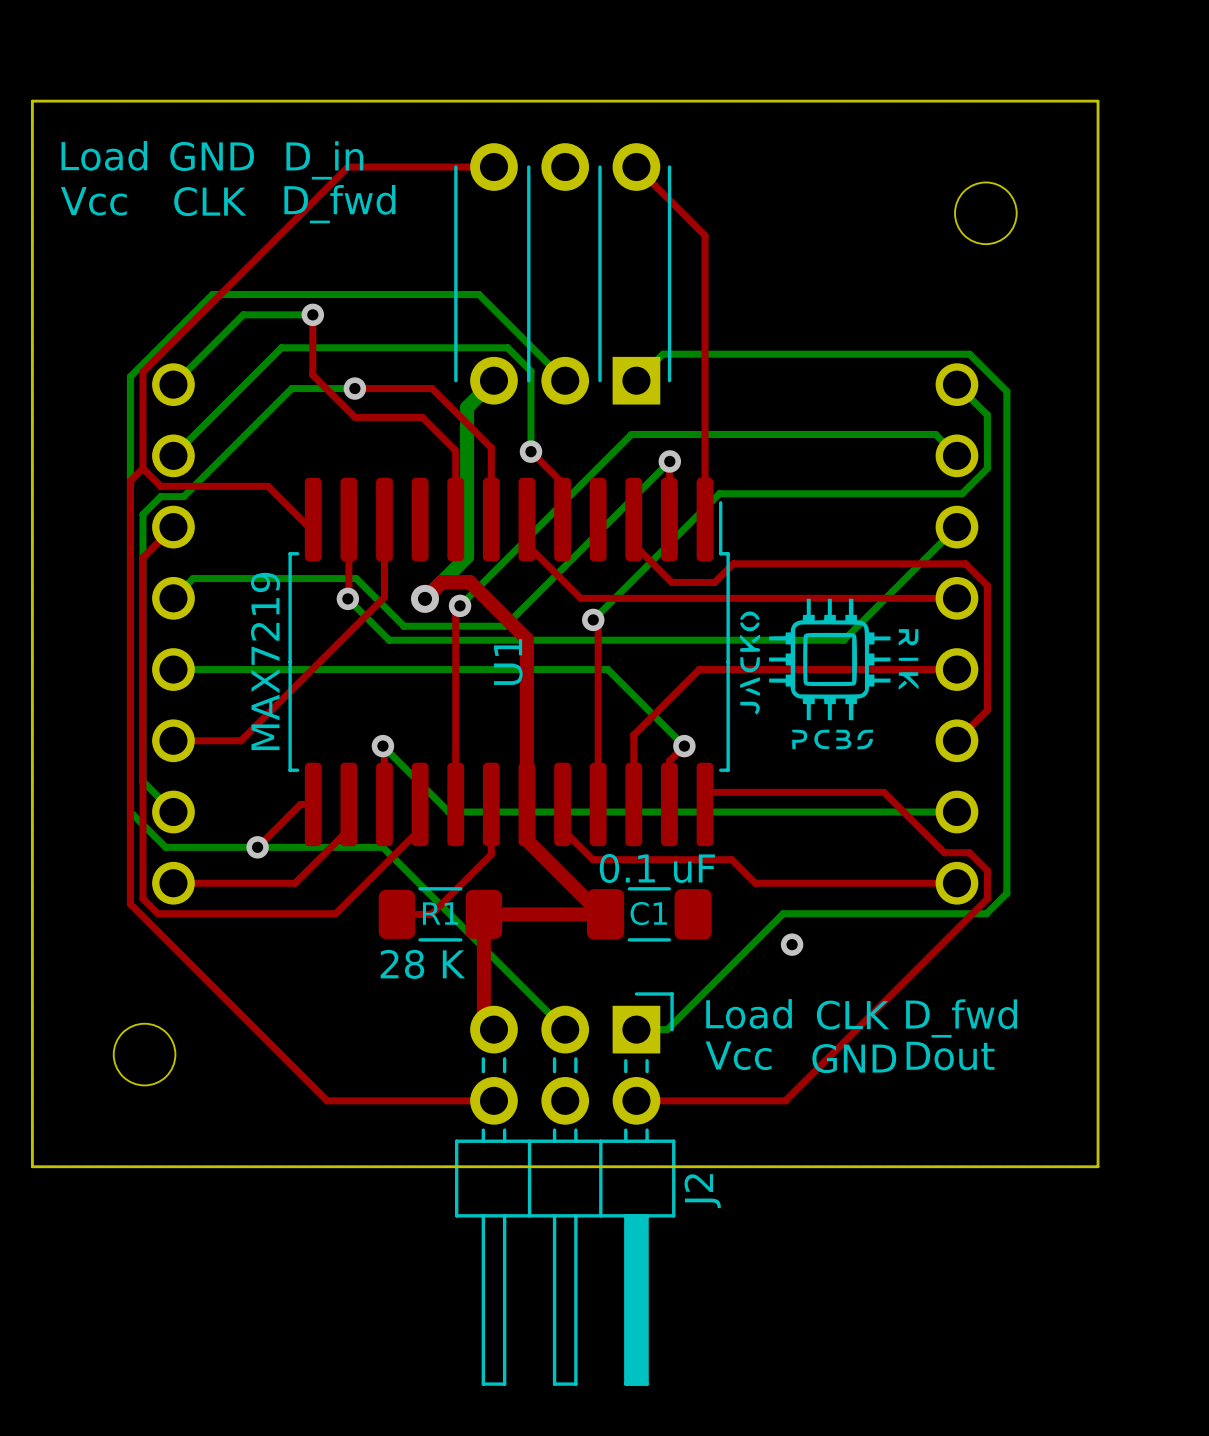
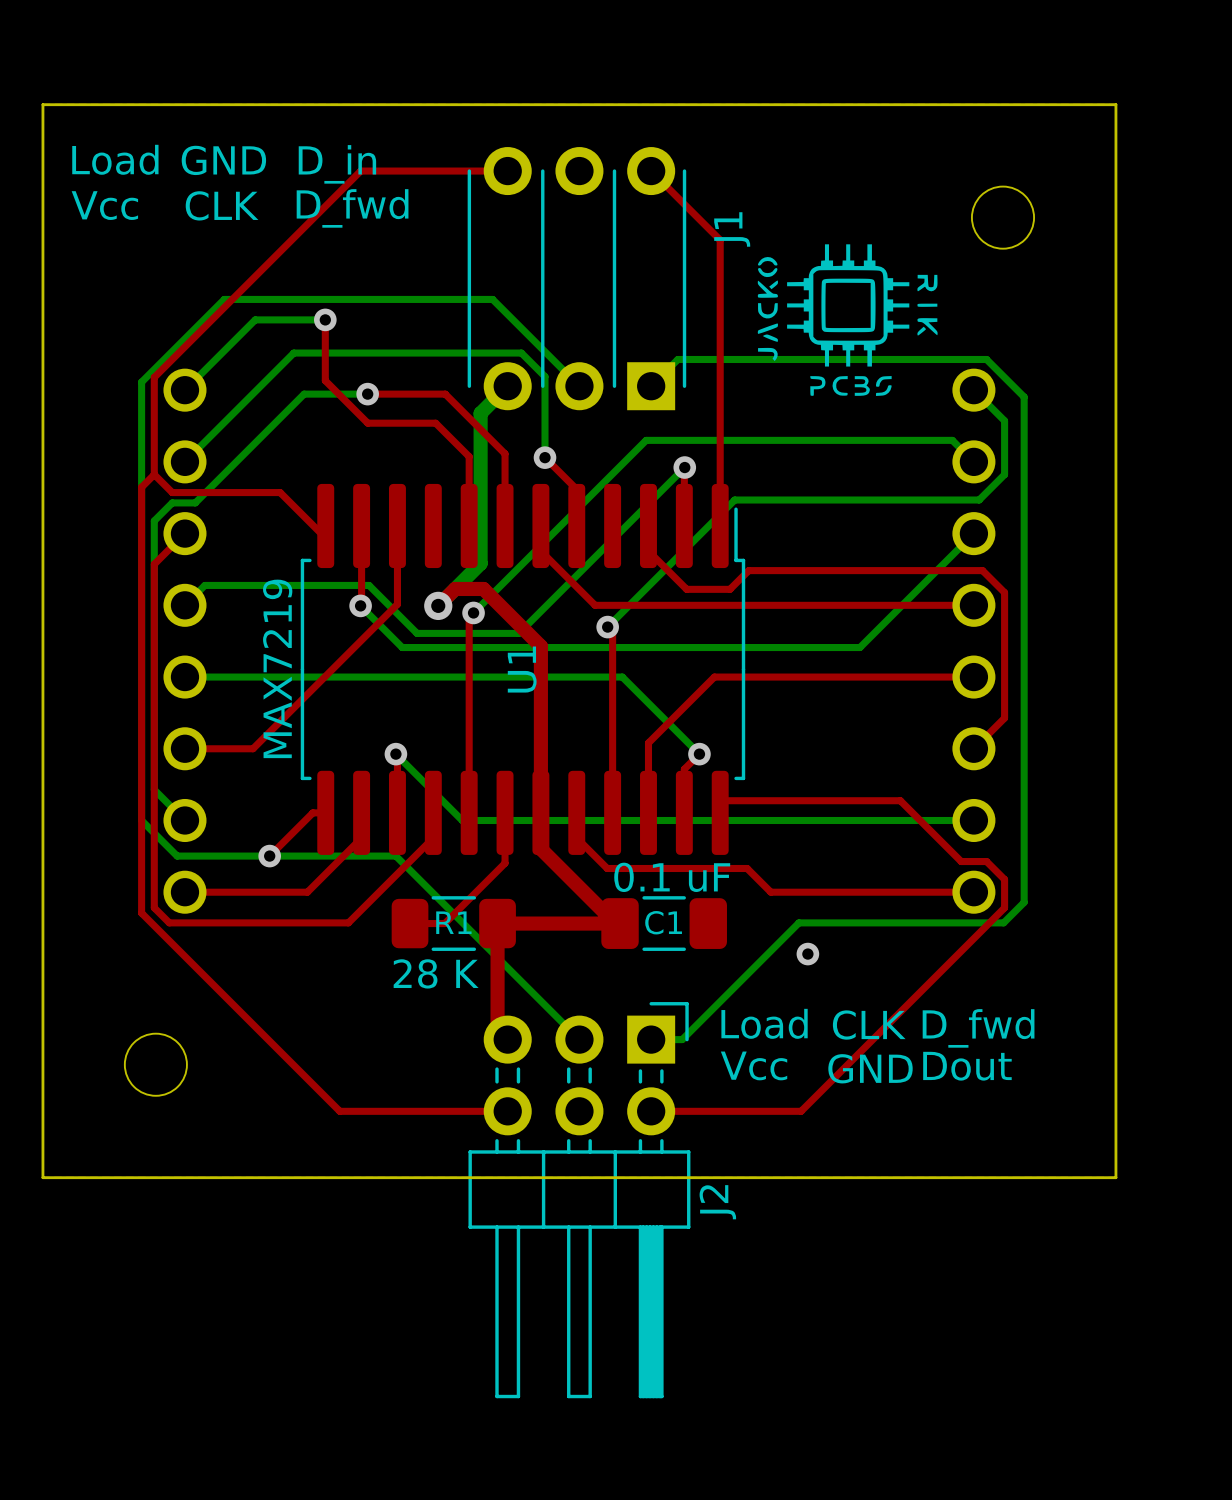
J1 name: none -> J1 (732, 229)
drawing position: (829, 674) -> (847, 320)

